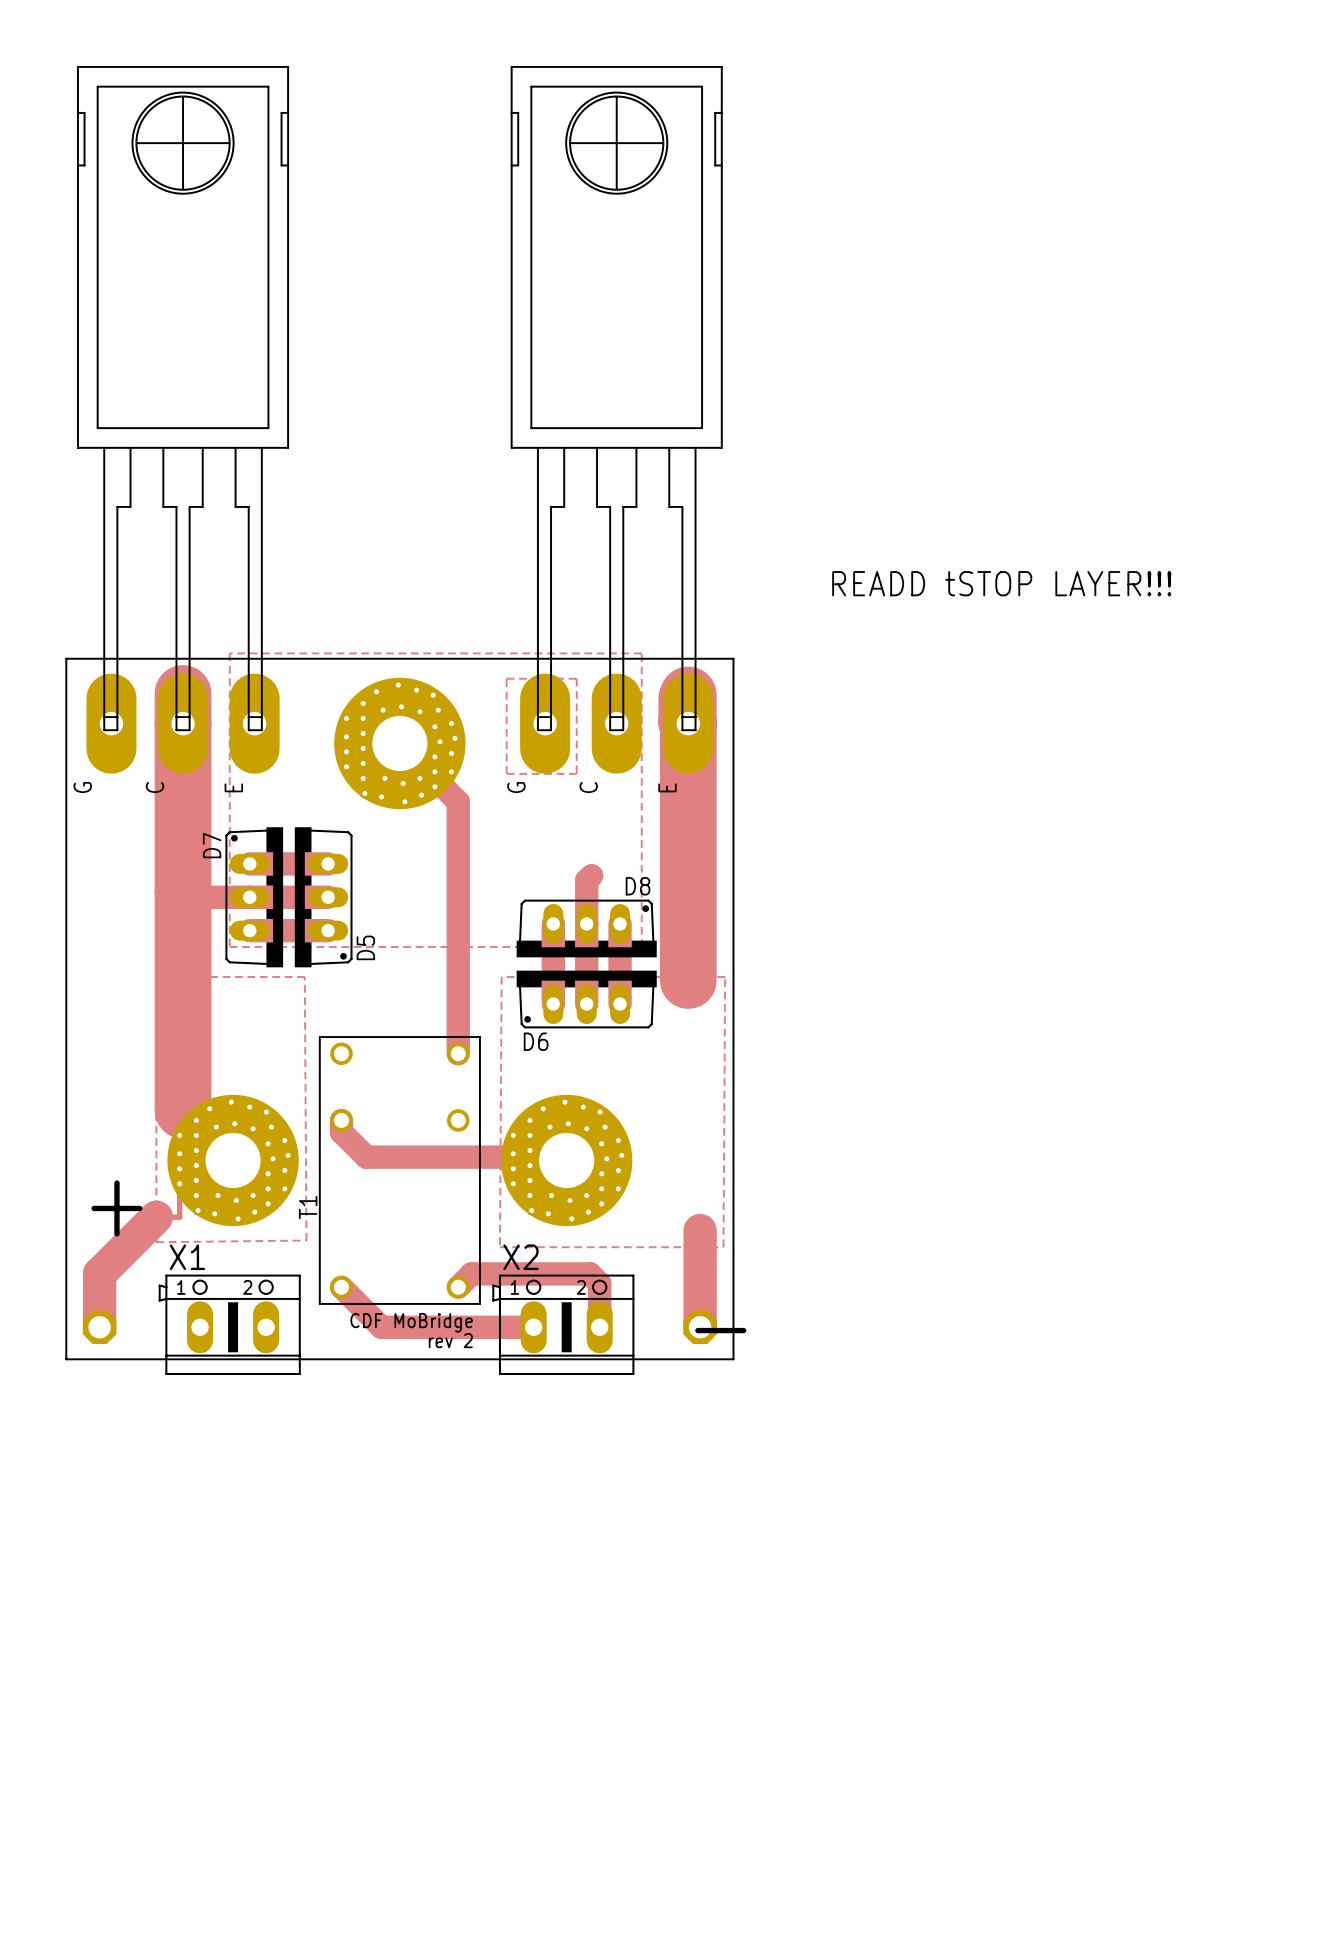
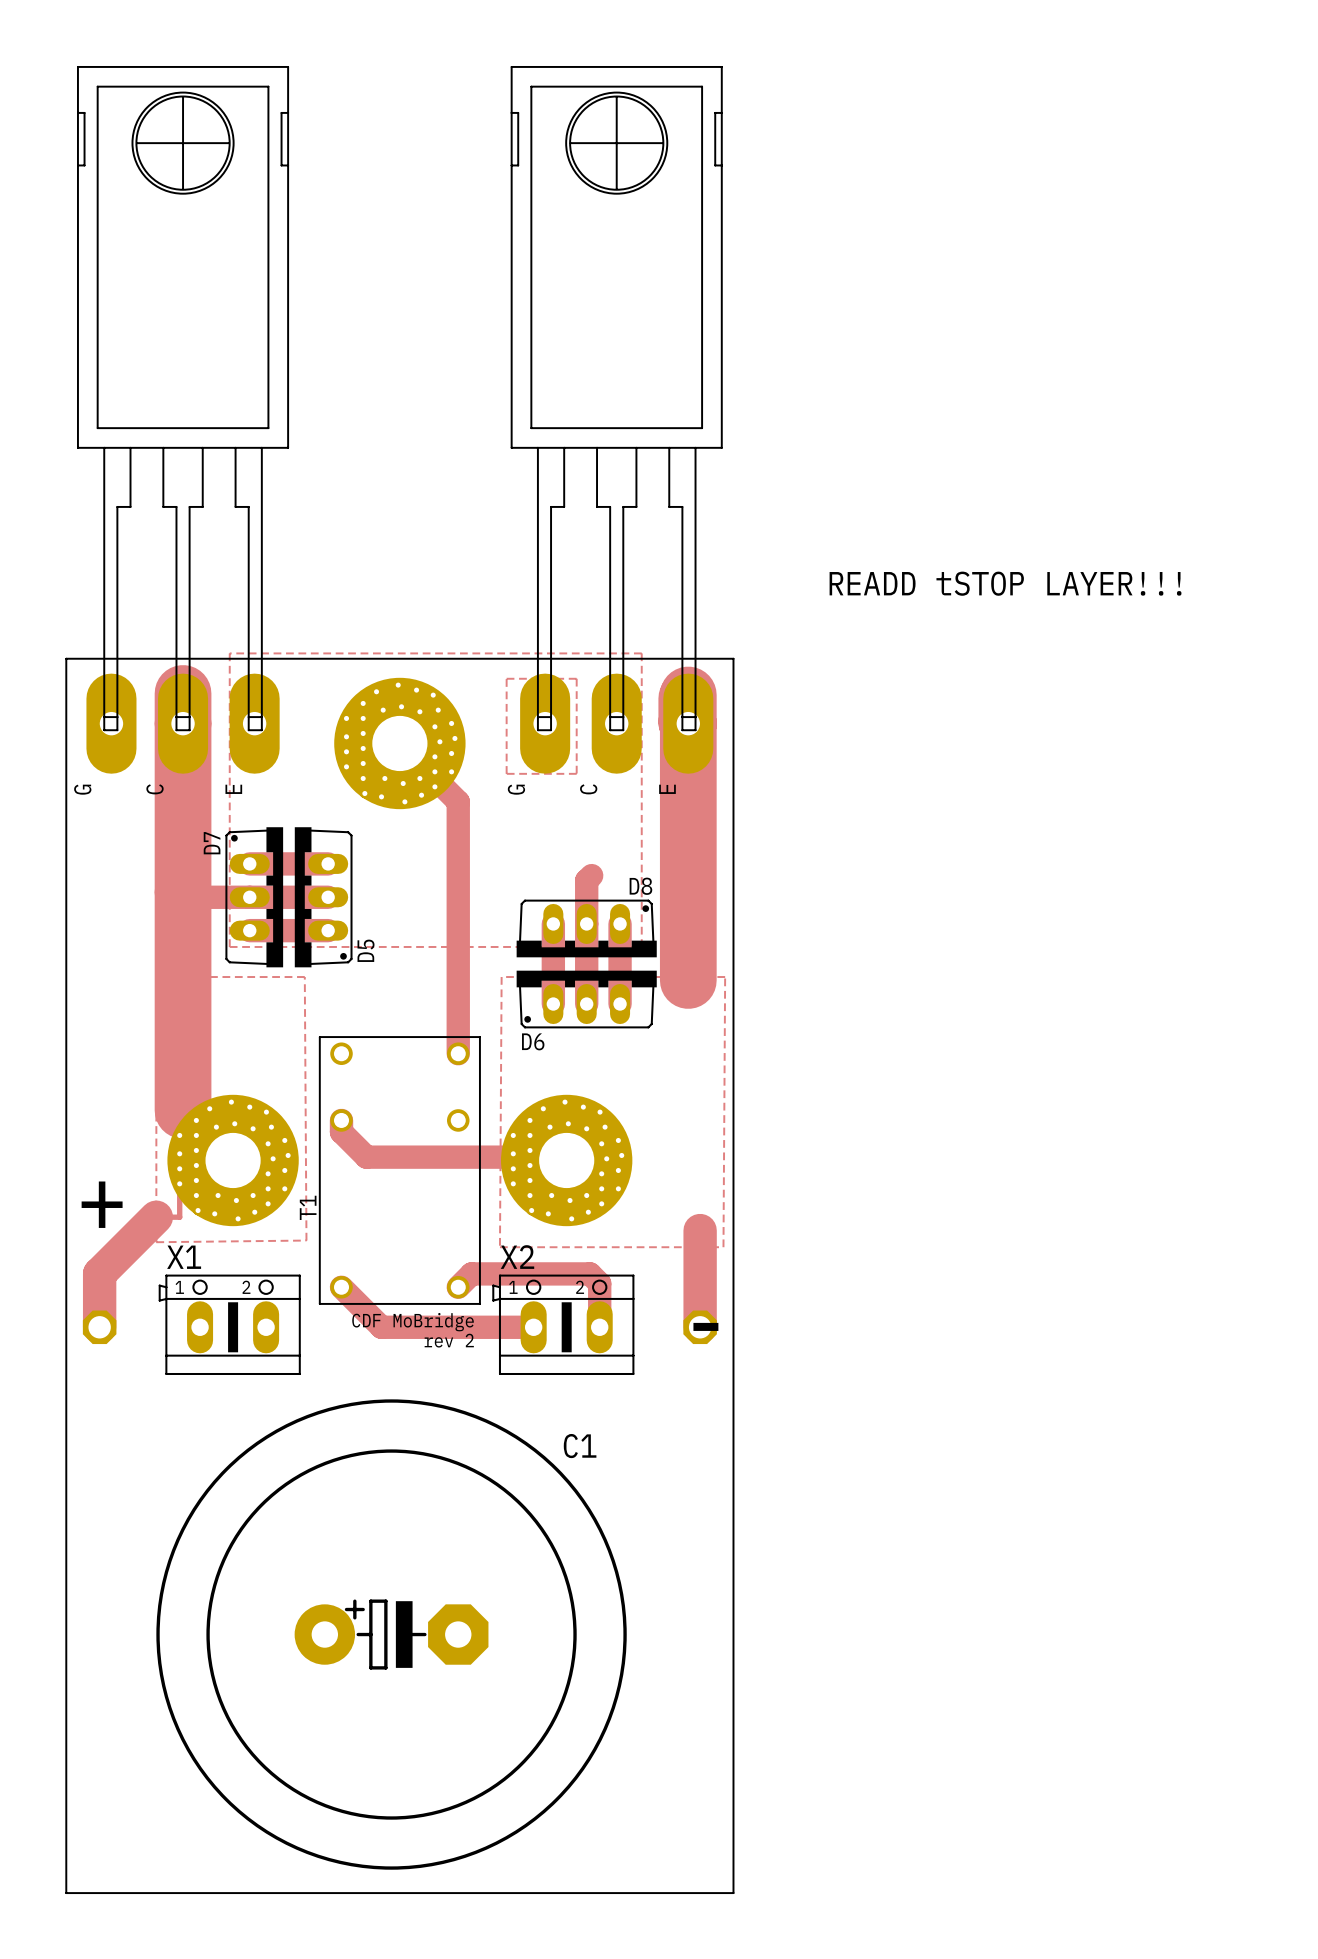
board edge: (66, 1359) (733, 1359) -> (66, 1359) (66, 1893) (733, 1893) (733, 1359)
C1: none -> (391, 1634)

